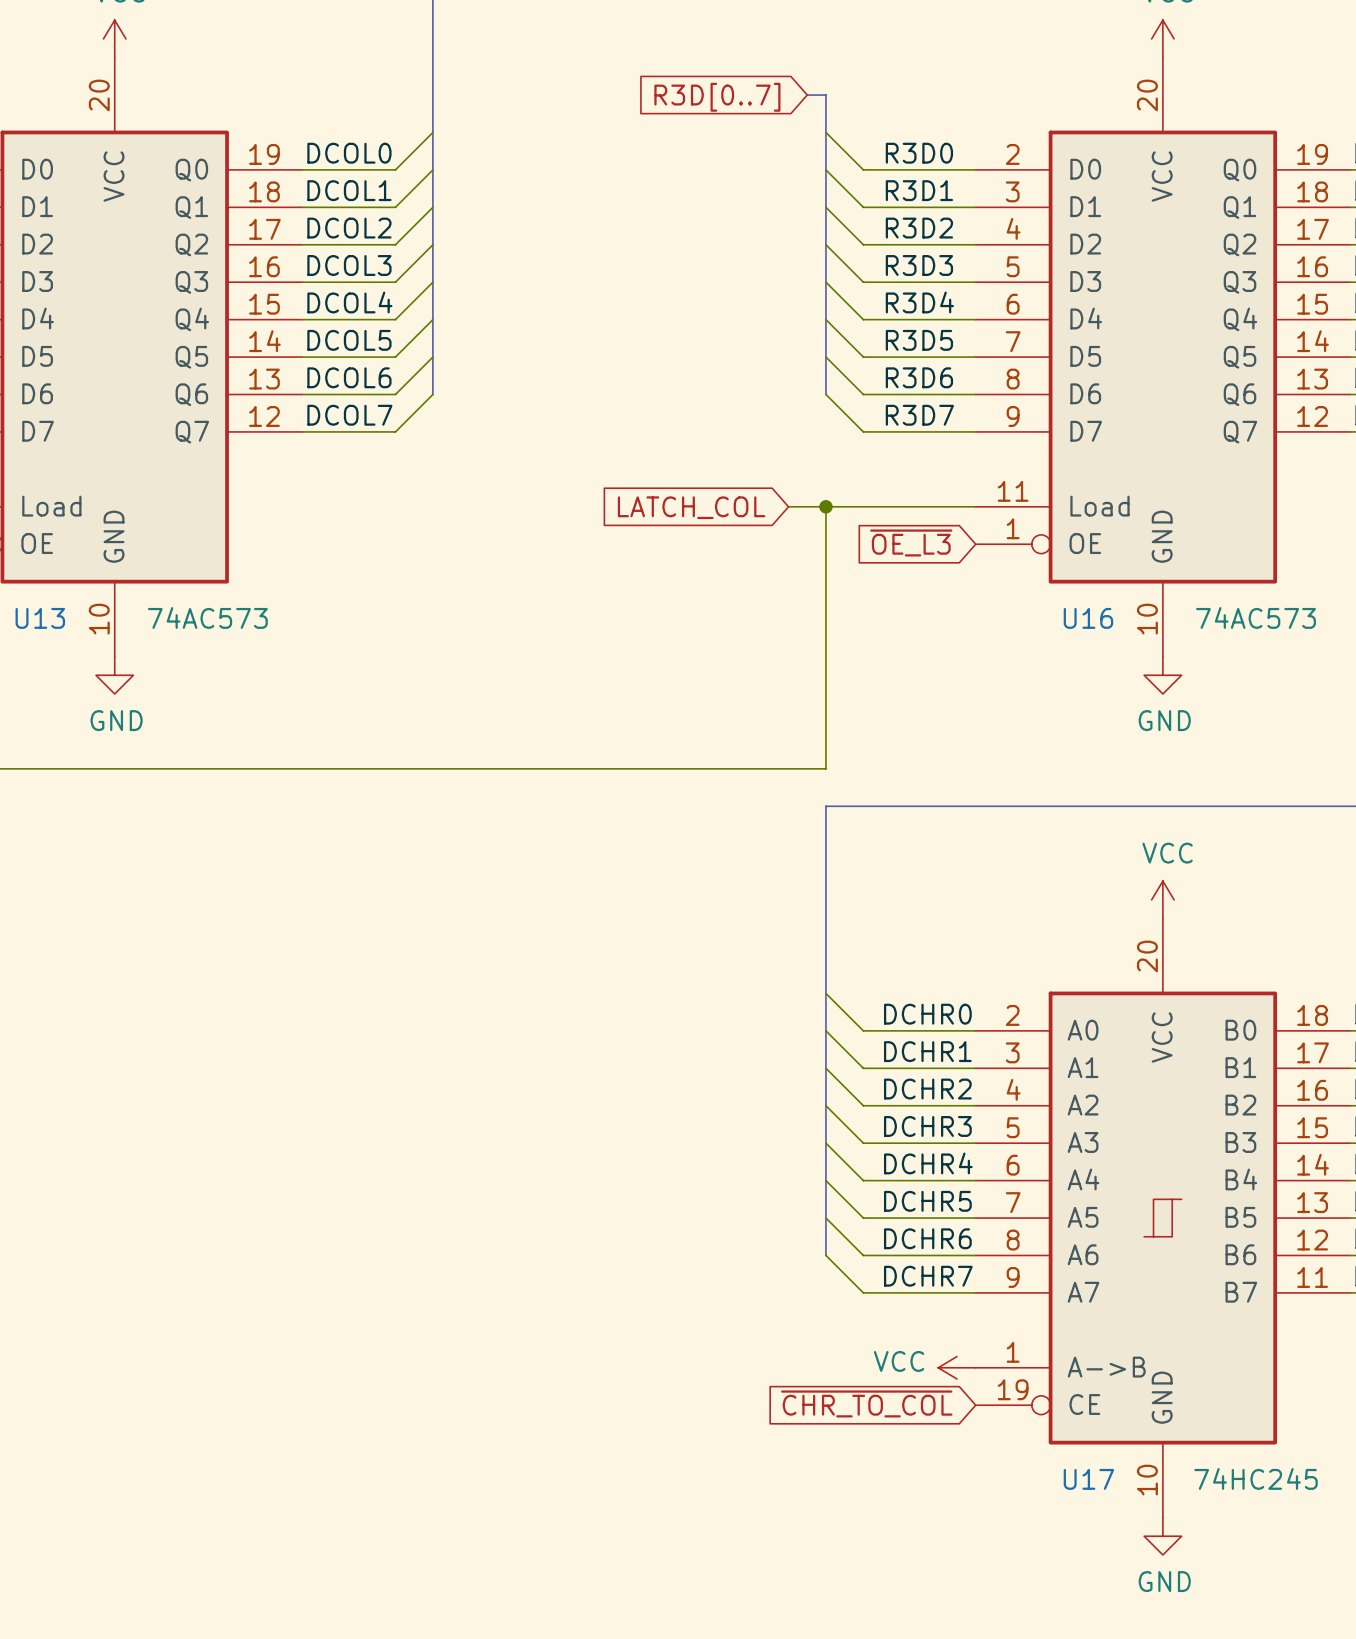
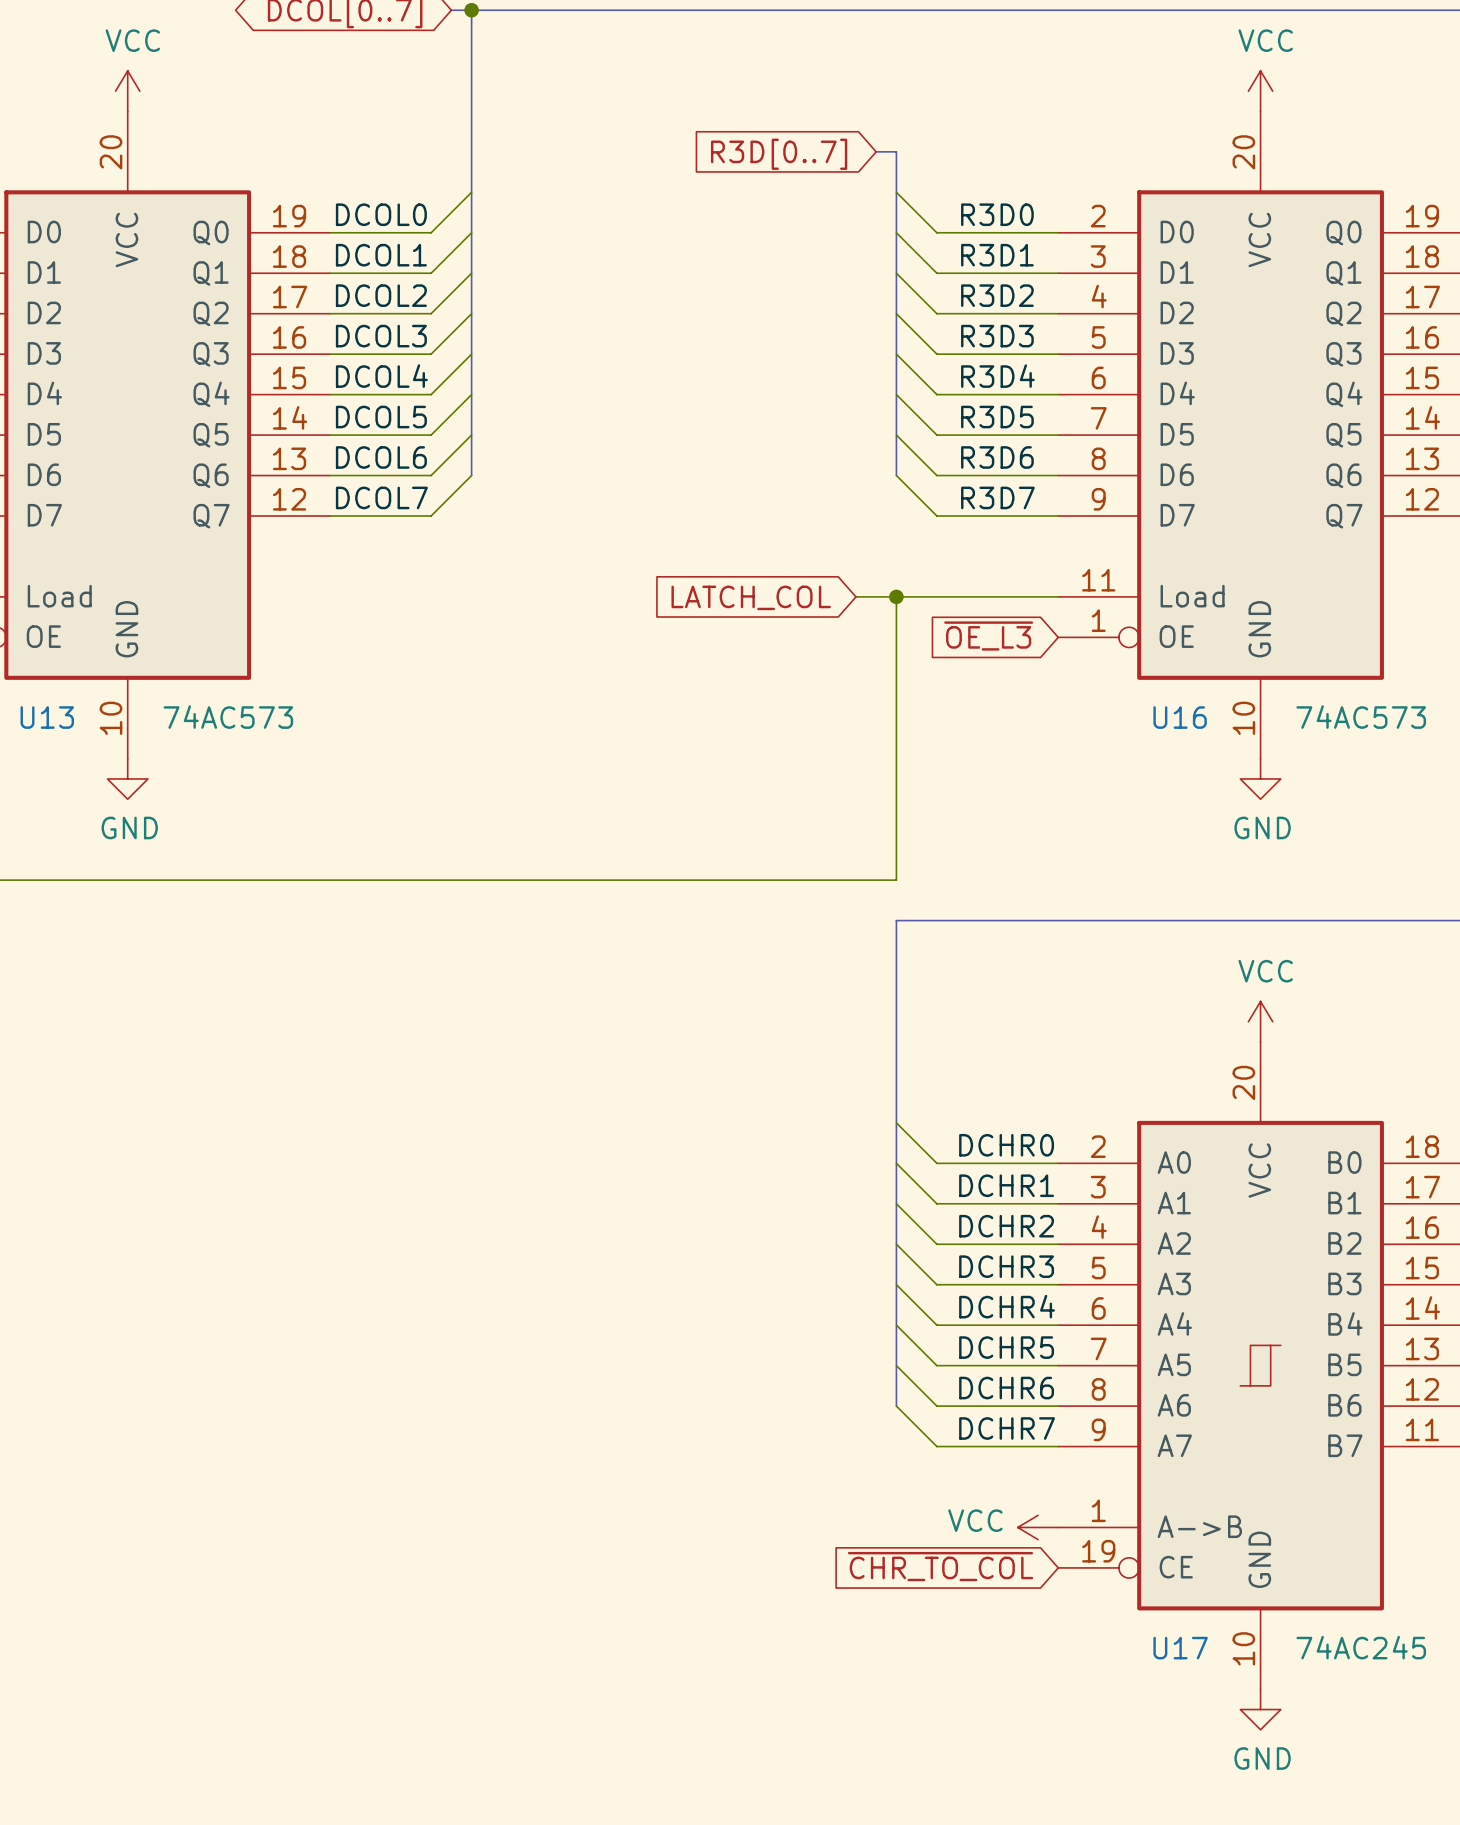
U17 value: 74HC245 (1256, 1478) -> 74AC245 (1361, 1647)

